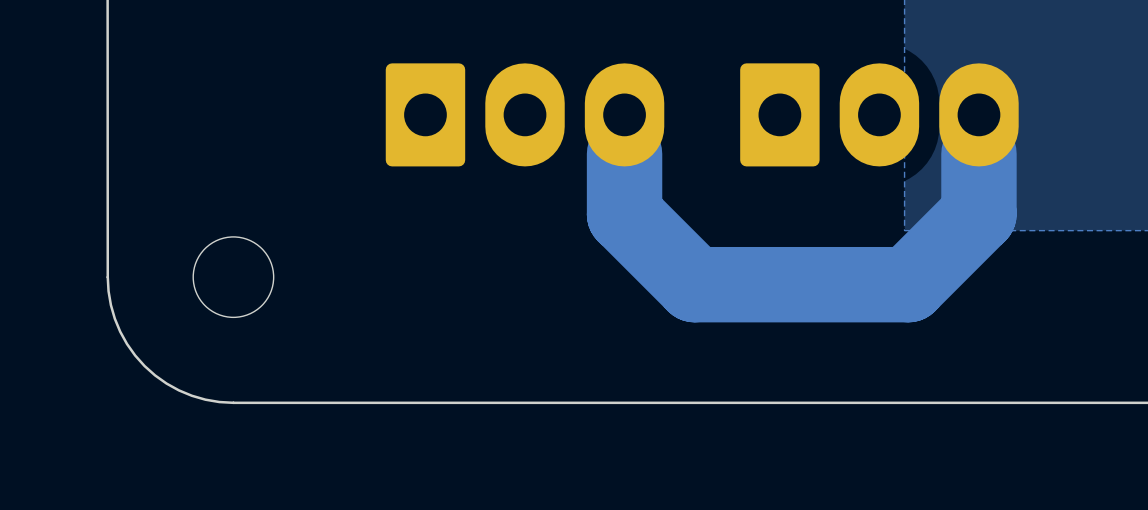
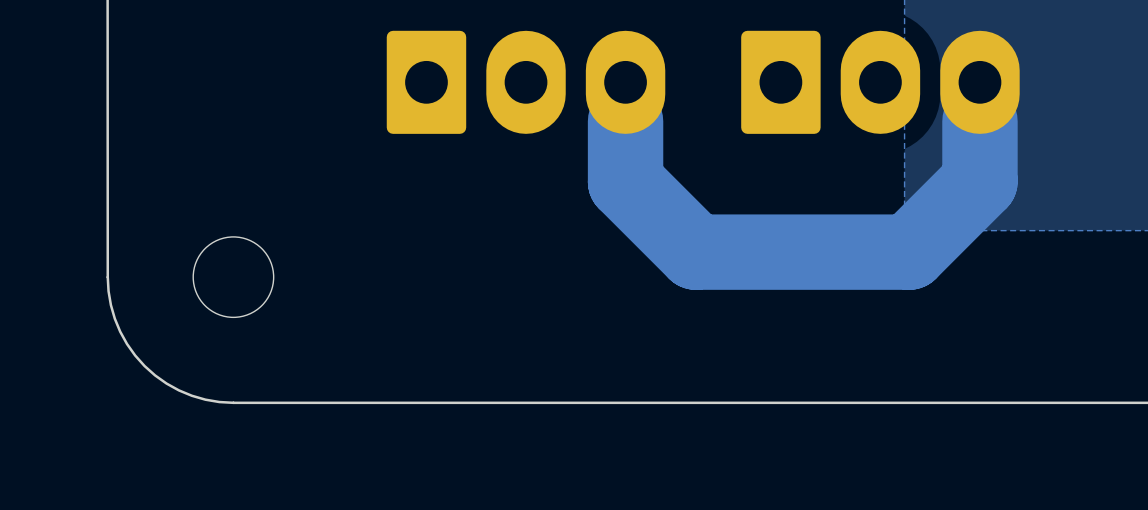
part position: (525, 114) -> (526, 82)
part position: (879, 114) -> (880, 82)
track: (978, 153) (978, 214) (908, 284) (694, 284) (624, 214) (624, 153) -> (979, 121) (979, 181) (909, 252) (695, 252) (625, 182) (625, 121)

